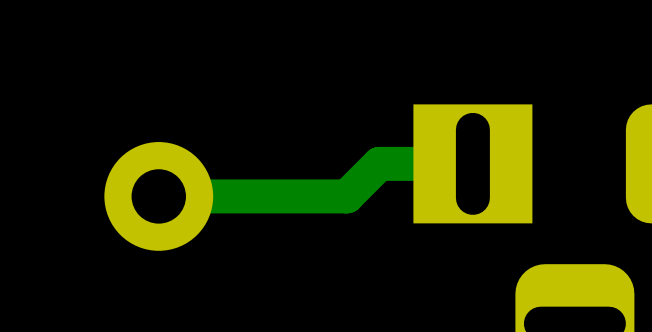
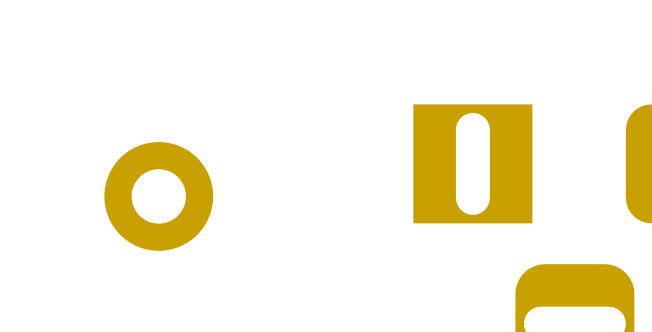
track: (472, 163) (379, 163) (346, 196) (158, 196) -> none

